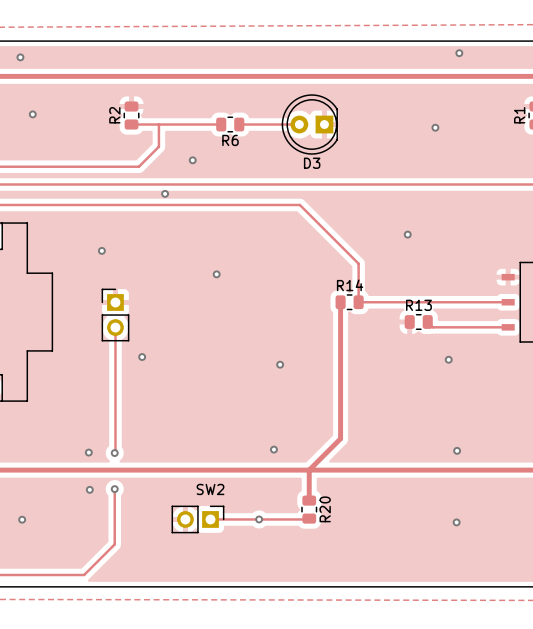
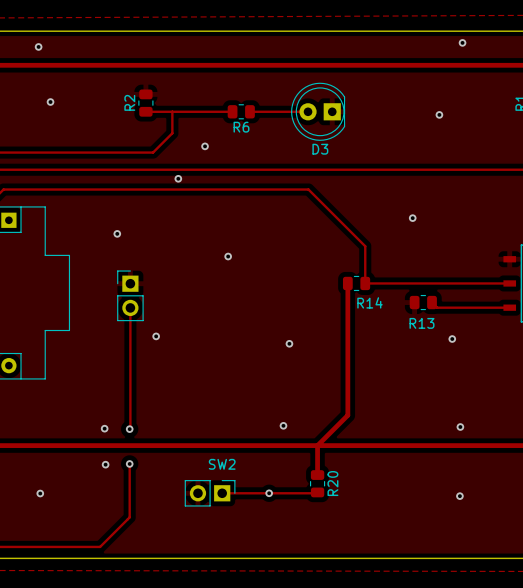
R14 name position: R14 (350, 285) -> R14 (370, 302)
R13 name position: R13 (418, 305) -> R13 (421, 323)

